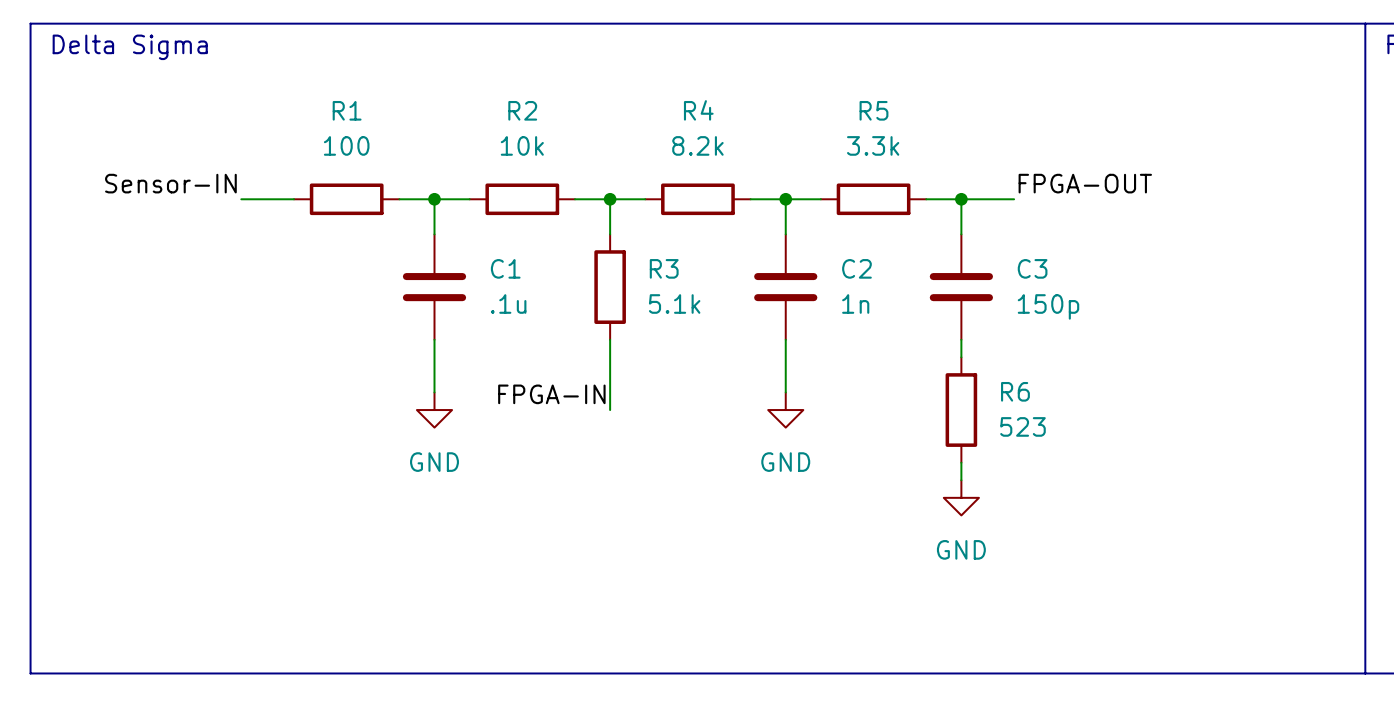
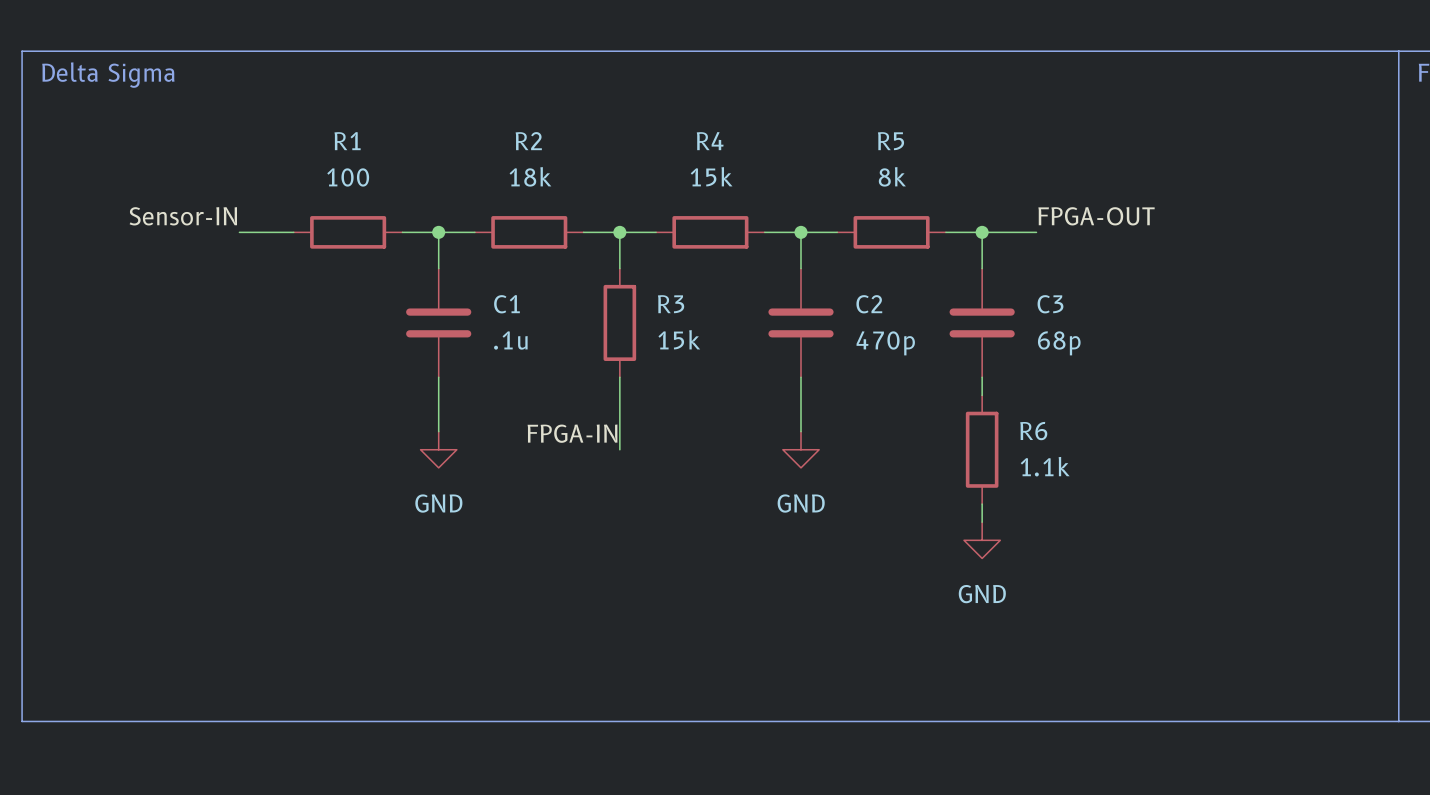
R2 value: 10k (522, 145) -> 18k (530, 176)
R4 value: 8.2k (697, 145) -> 15k (711, 176)
R5 value: 3.3k (873, 145) -> 8k (892, 176)
R3 value: 5.1k (674, 304) -> 15k (679, 339)
C2 value: 1n (855, 304) -> 470p (885, 343)
C3 value: 150p (1048, 306) -> 68p (1059, 343)
R6 value: 523 (1022, 426) -> 1.1k (1045, 466)

